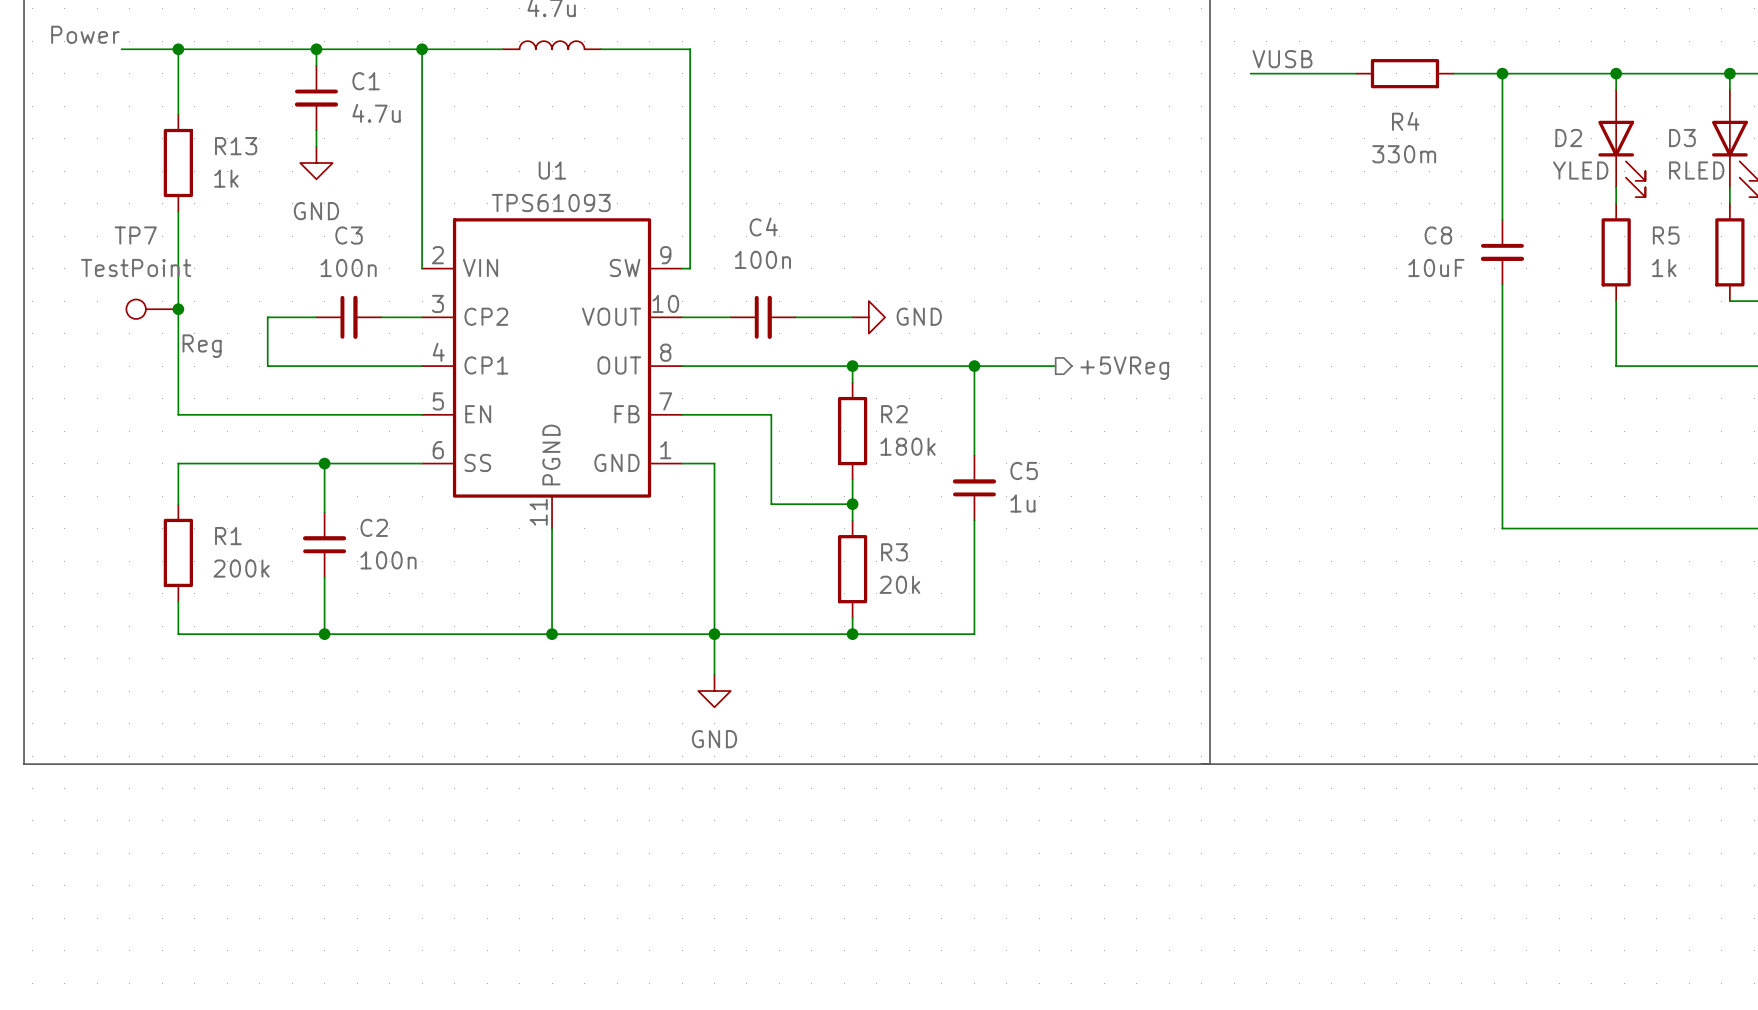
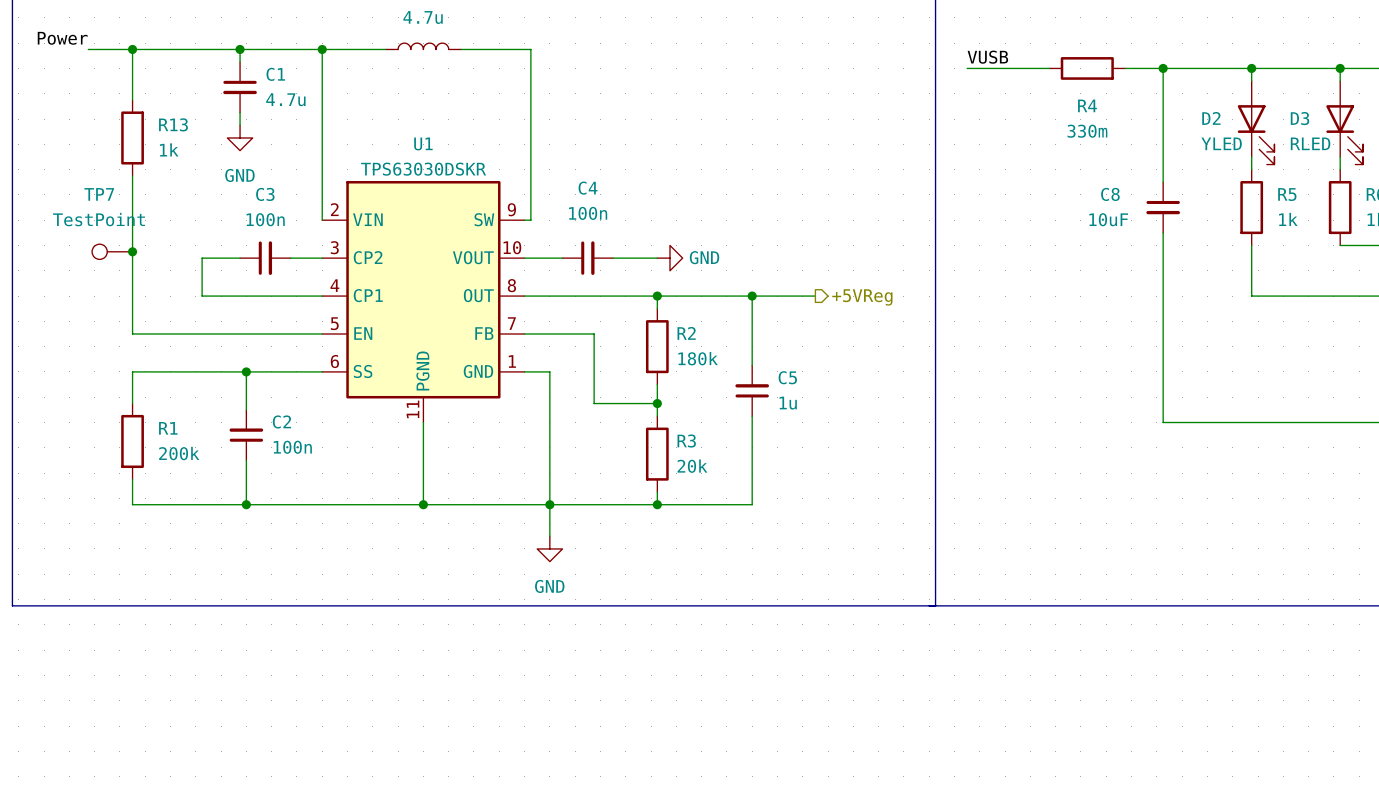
U1 value: TPS61093 (551, 203) -> TPS63030DSKR (423, 169)
label: Reg (202, 346) -> none

